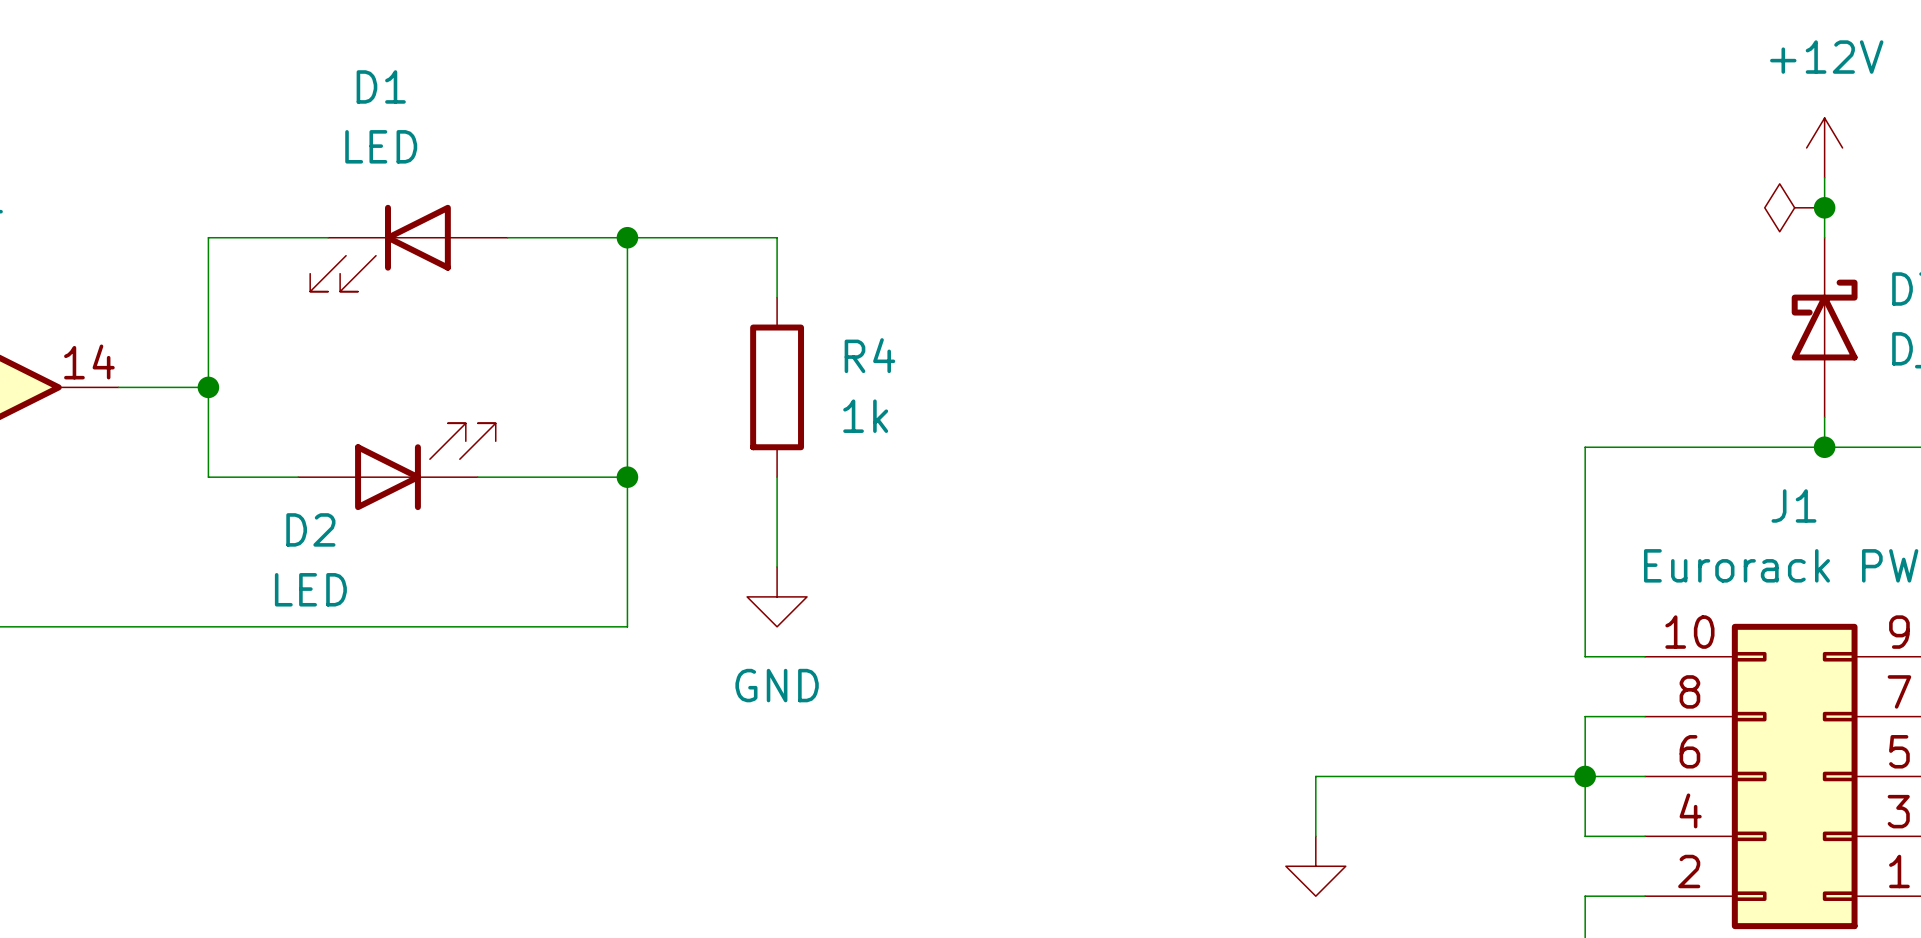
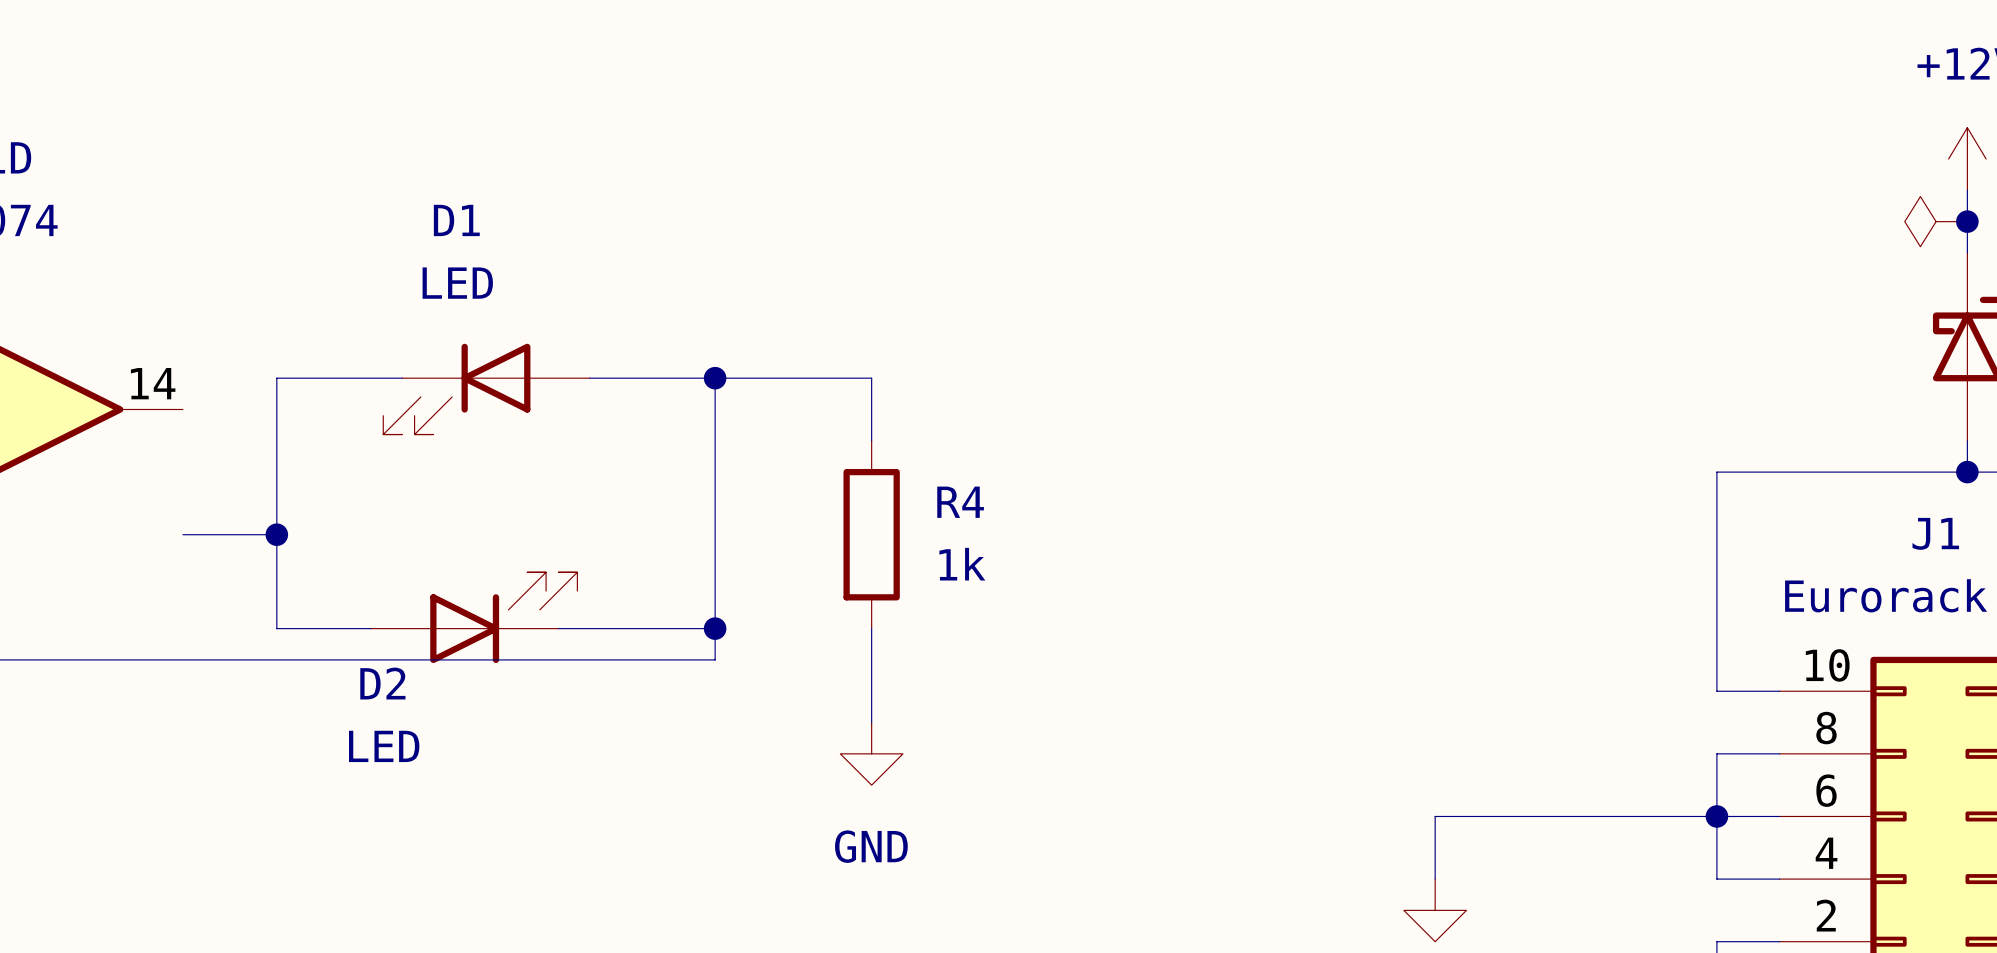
wire: (328, 237) (208, 237) (208, 357) -> (402, 378) (276, 378)
wire: (507, 237) (777, 237) (777, 297) -> (589, 378) (871, 378) (871, 440)
wire: (627, 237) (627, 357) -> none
junction: (627, 237) -> none
D1 position: (408, 248) -> (486, 389)
junction: none -> (715, 378)
wire: (118, 387) (208, 387) -> (182, 534) (276, 534)
junction position: (208, 387) -> (276, 534)
R4 position: (777, 387) -> (871, 534)
D2 position: (396, 466) -> (474, 617)
wire: (208, 477) (298, 477) -> (276, 503) (276, 628) (370, 628)
wire: (477, 477) (627, 477) -> (558, 628) (715, 628)
junction: (627, 477) -> none
wire: (777, 477) (777, 566) -> (871, 628) (871, 722)
junction: none -> (715, 628)
power symbol position: GND (777, 596) -> GND (871, 753)

